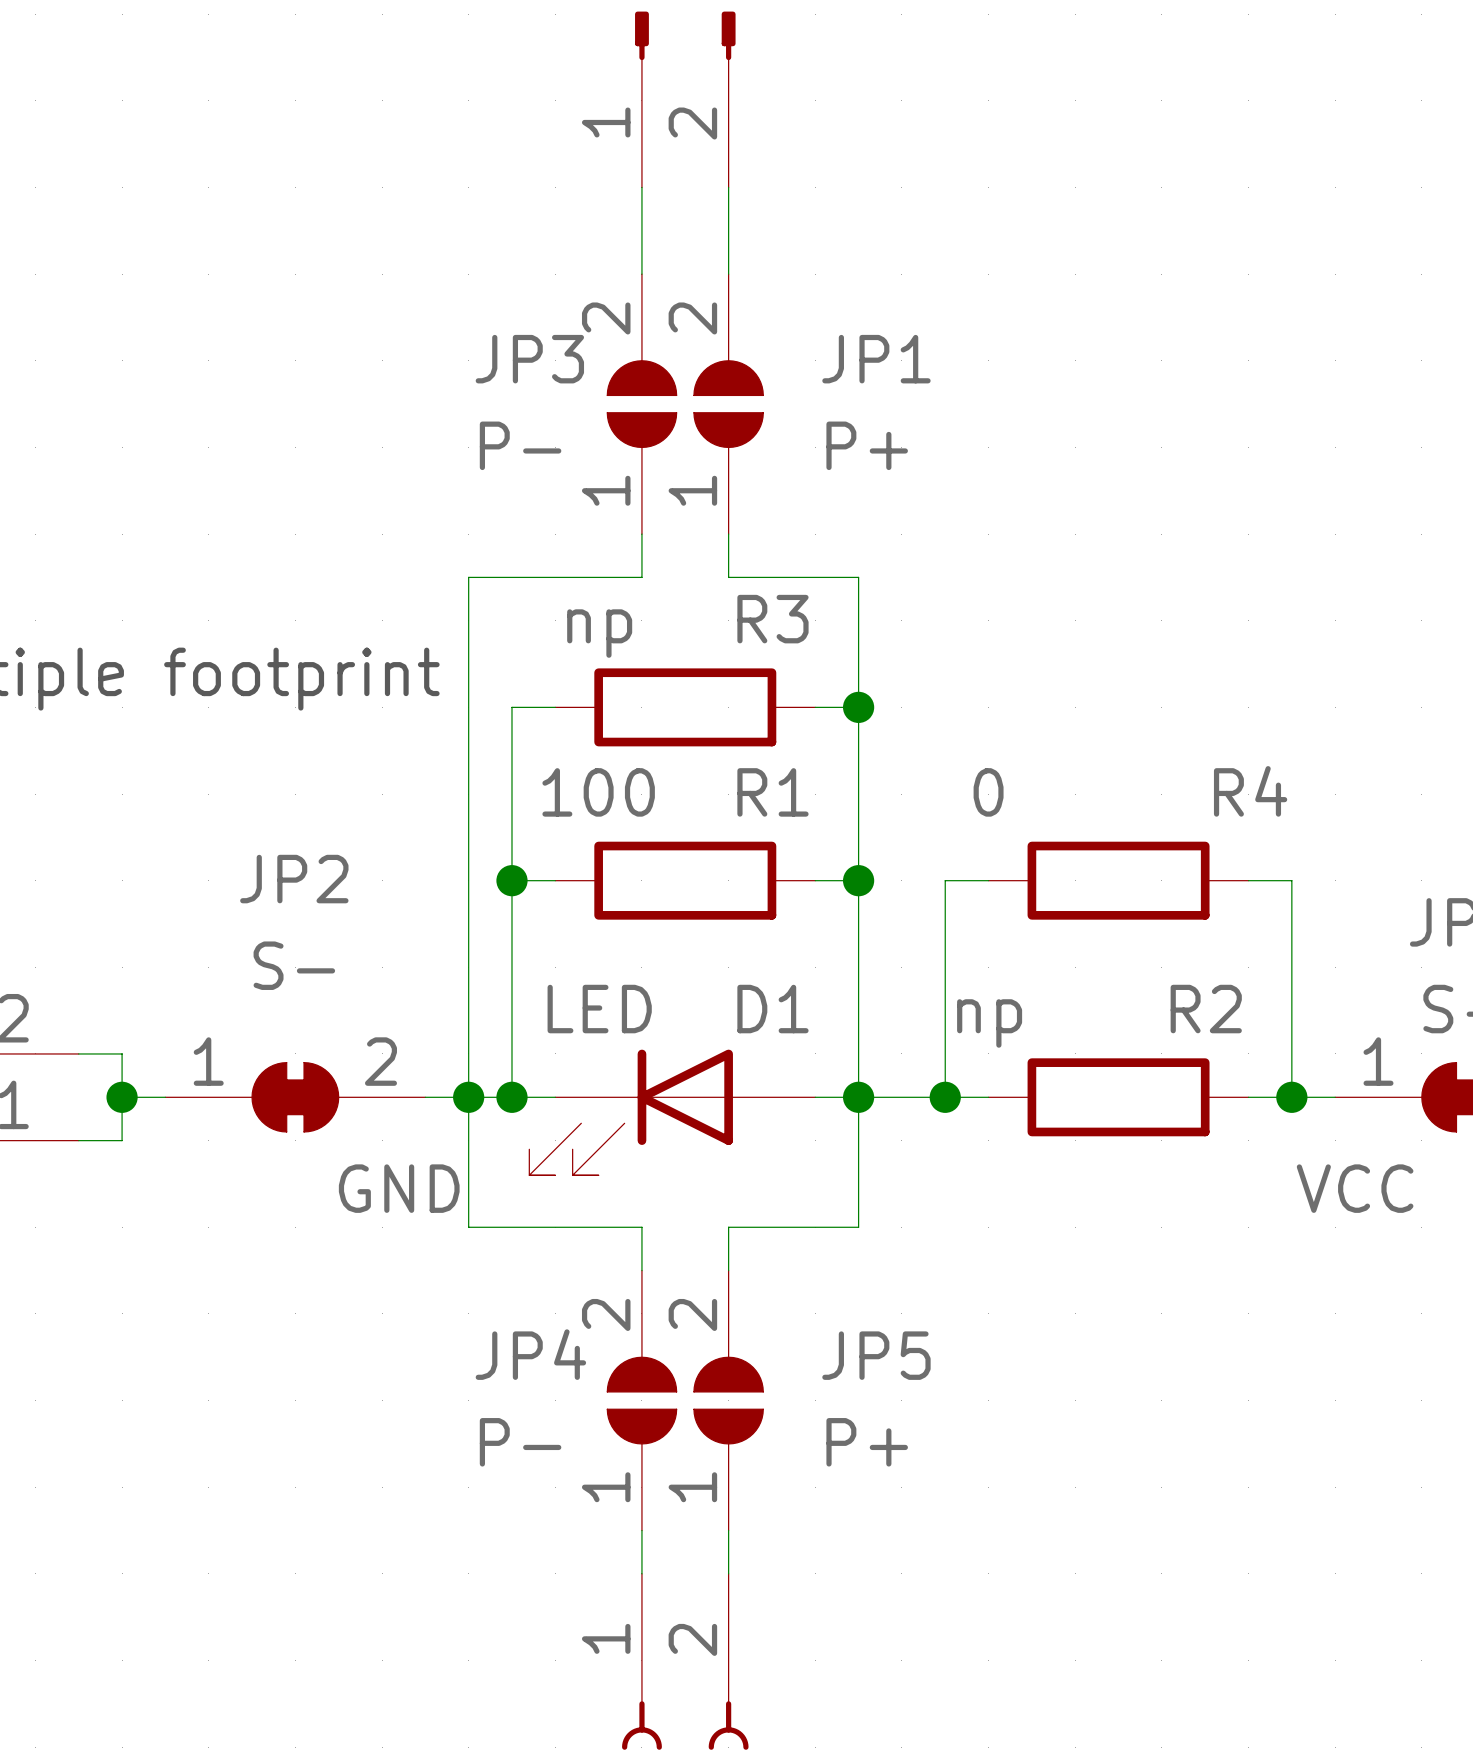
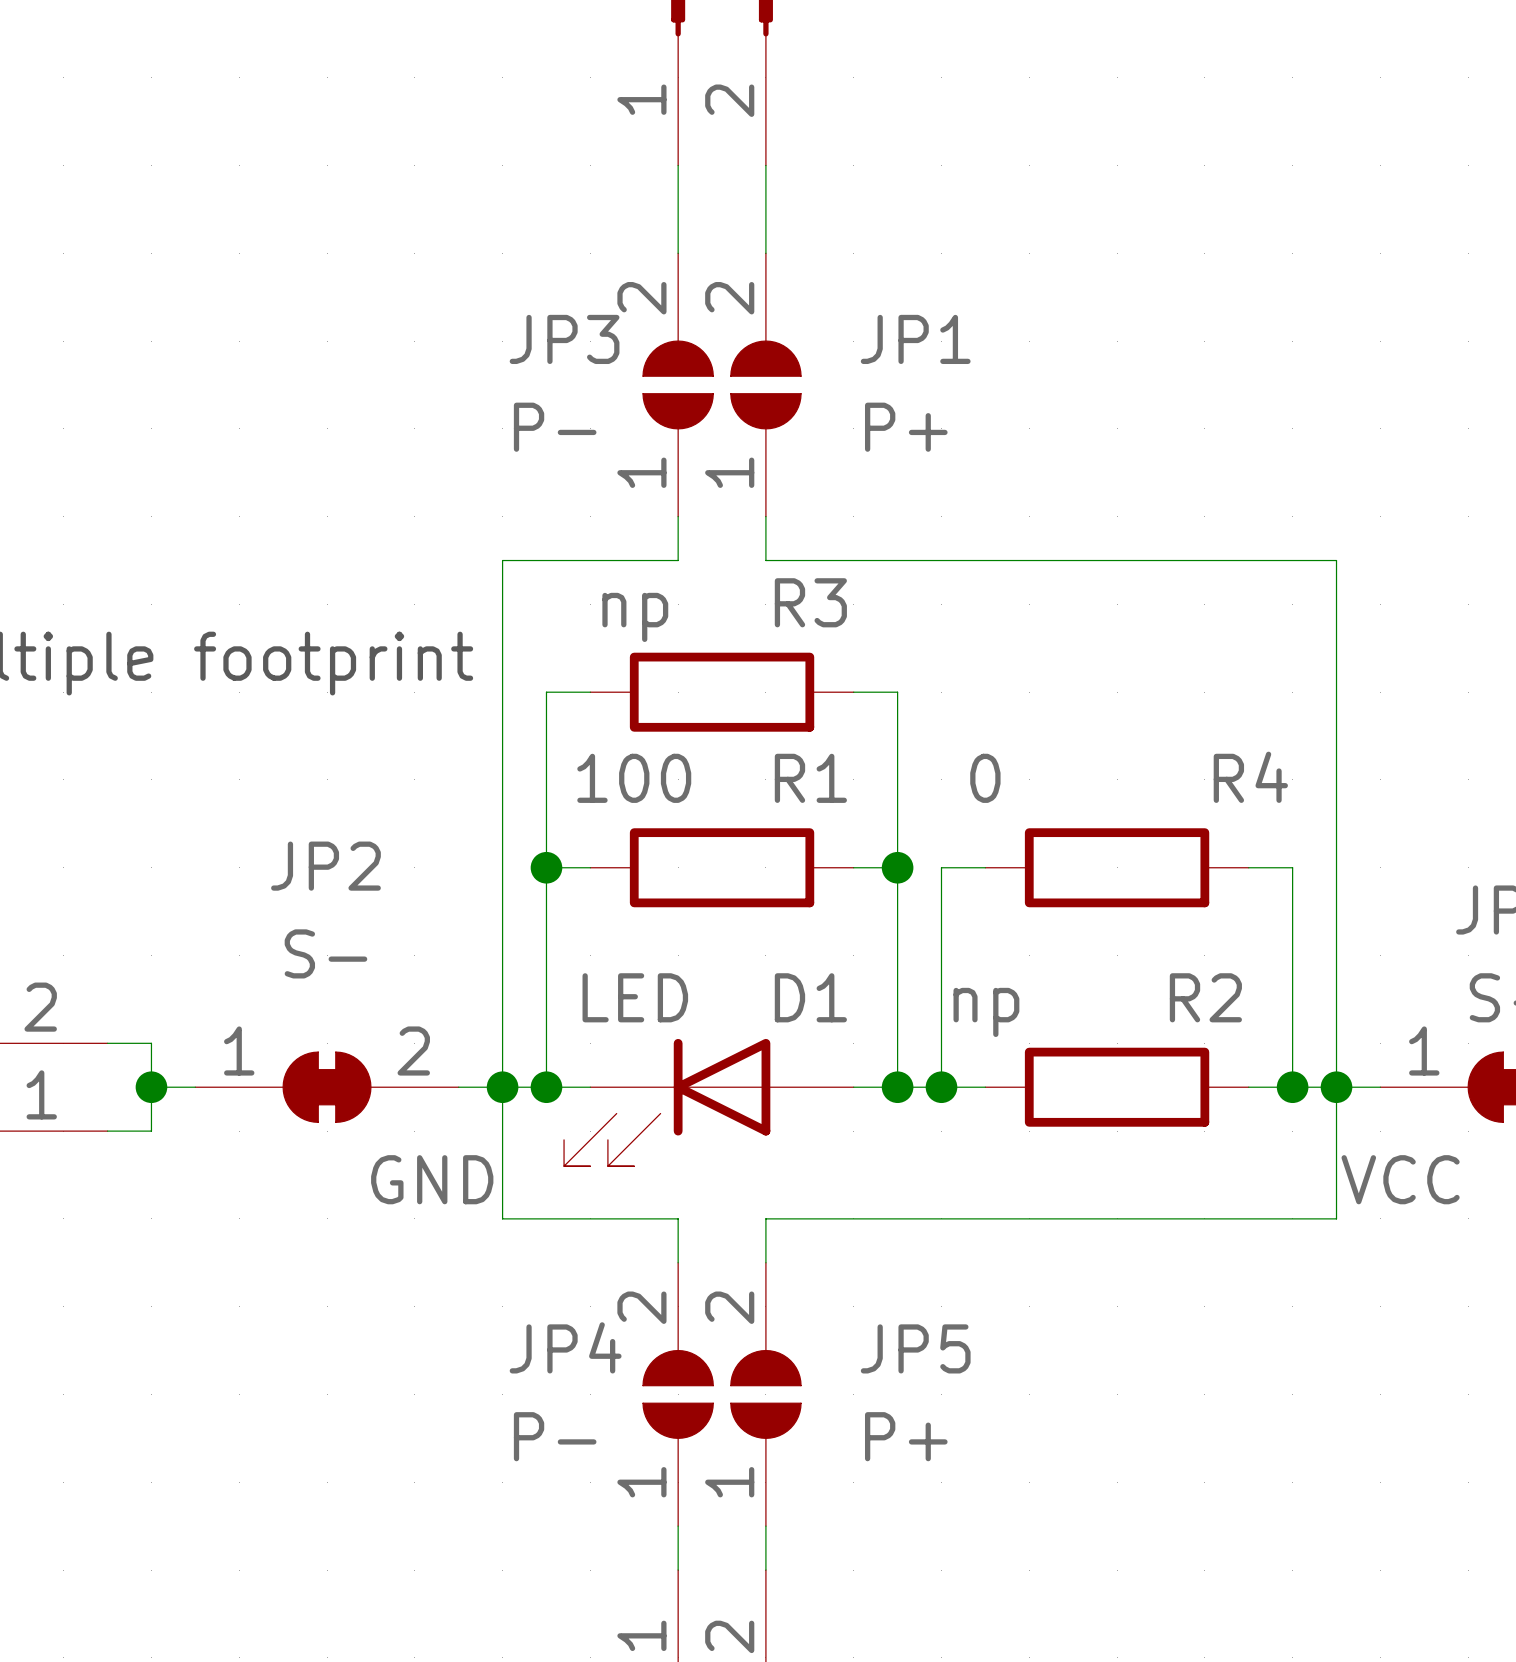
wire: (858, 577) (858, 707) -> (897, 560) (1336, 560) (1336, 867)
junction: (858, 707) -> none
wire: none -> (985, 867) (941, 867) (941, 1087)
wire: (988, 880) (945, 880) (945, 1097) (988, 1097) -> none
R4 position: (1118, 880) -> (1117, 867)
wire: none -> (1248, 867) (1292, 867) (1292, 1087) (1248, 1087)
wire: (1248, 880) (1291, 880) -> none
wire: (858, 1097) (858, 1227) -> (1336, 1087) (1336, 1218) (897, 1218)
junction position: (945, 1097) -> (941, 1087)
R2 position: (1118, 1097) -> (1117, 1087)
junction: none -> (1292, 1087)

